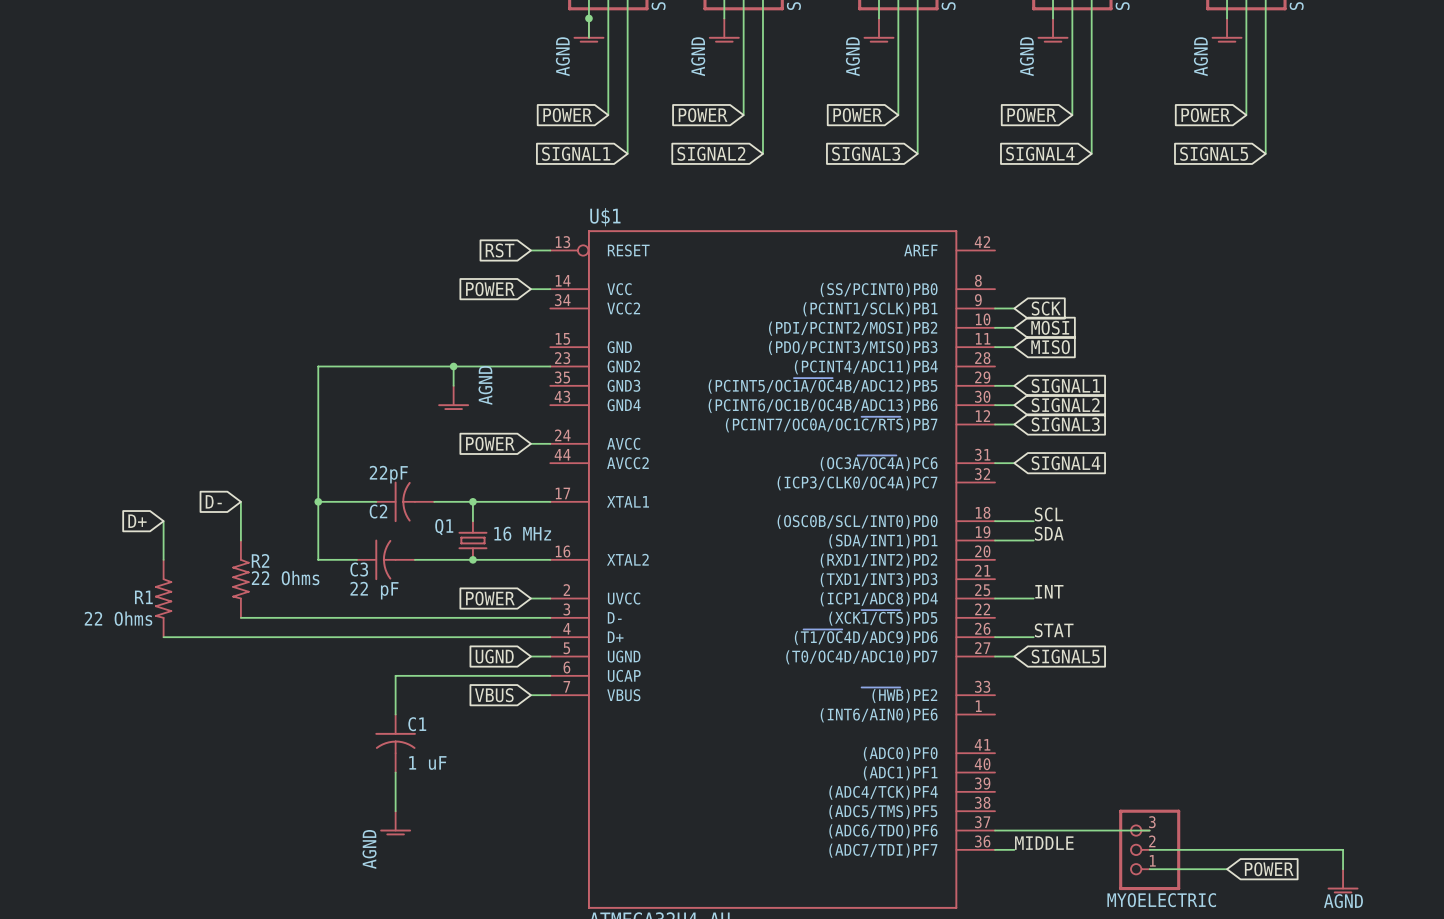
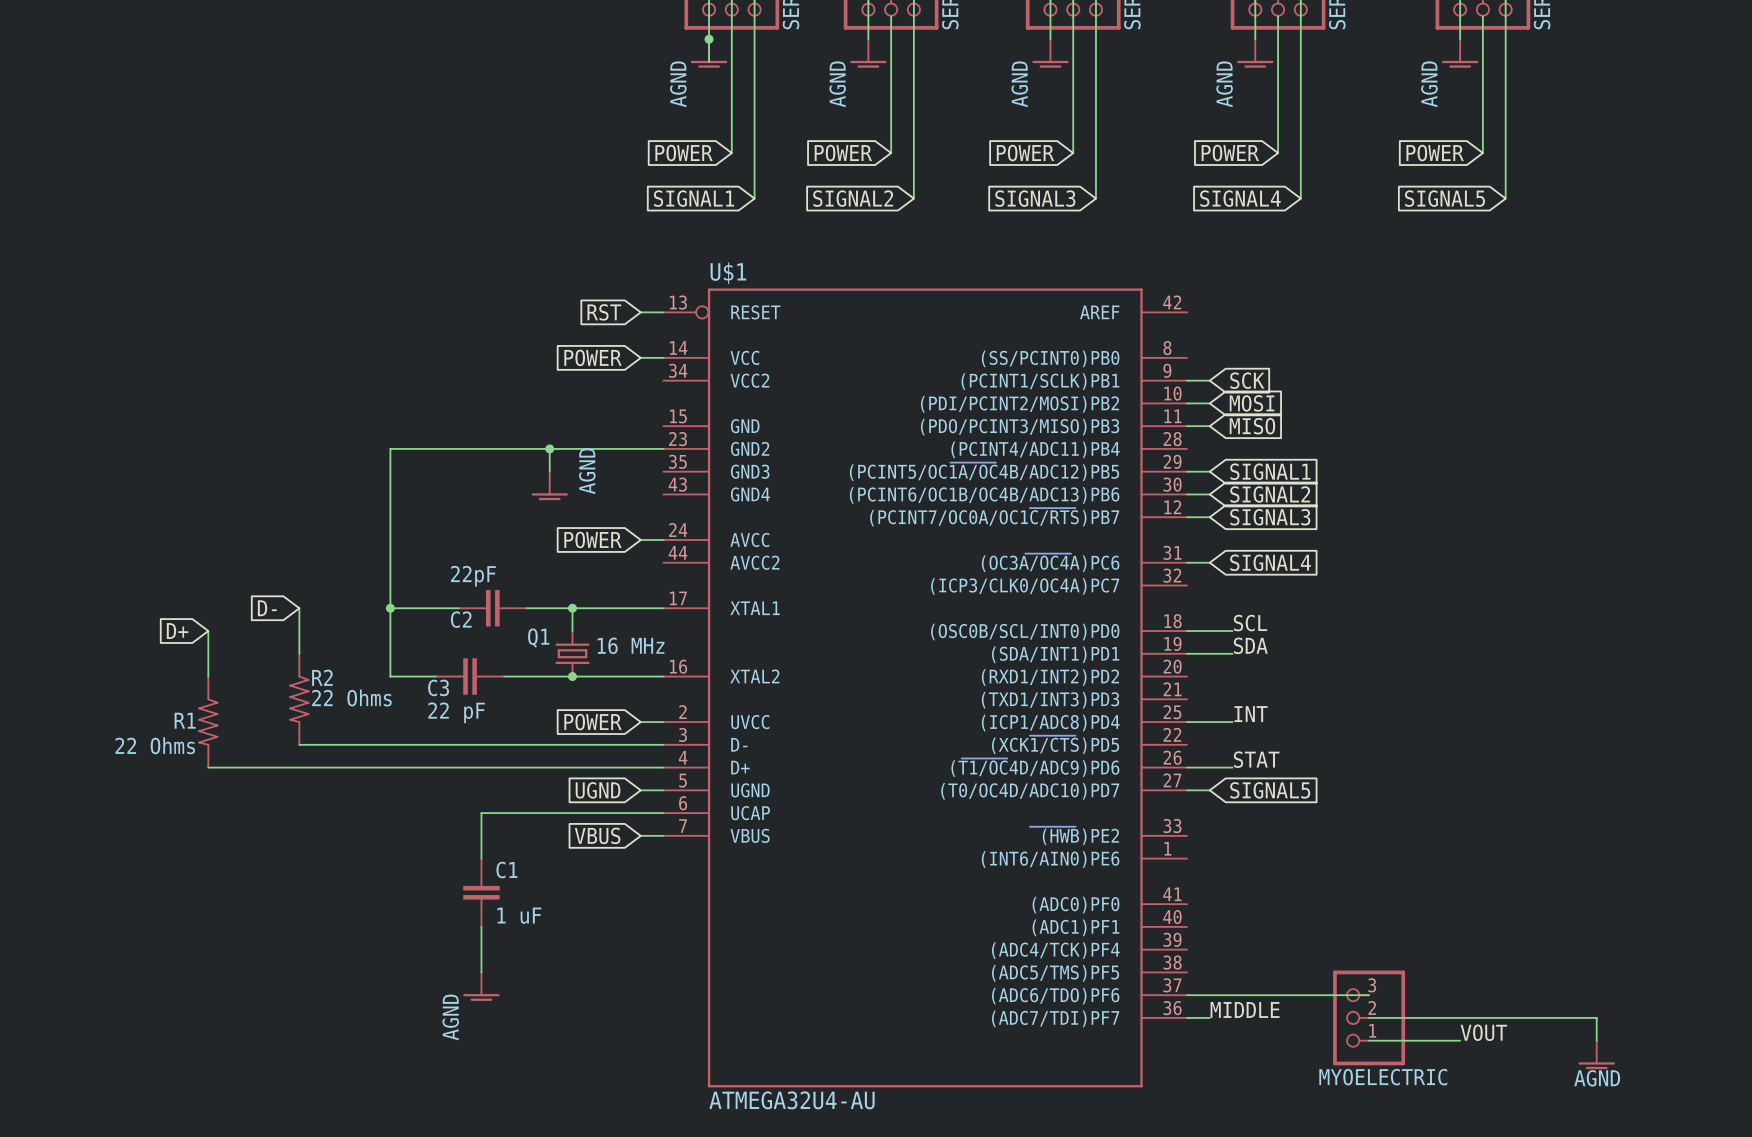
C2 symbol: [376, 481, 435, 523] -> [458, 590, 527, 627]
C3 symbol: [356, 539, 415, 581] -> [435, 658, 505, 695]
C1 symbol: [375, 714, 416, 773] -> [463, 858, 500, 927]
label: none -> VOUT (1483, 1032)
global label: POWER (1269, 869) -> none

